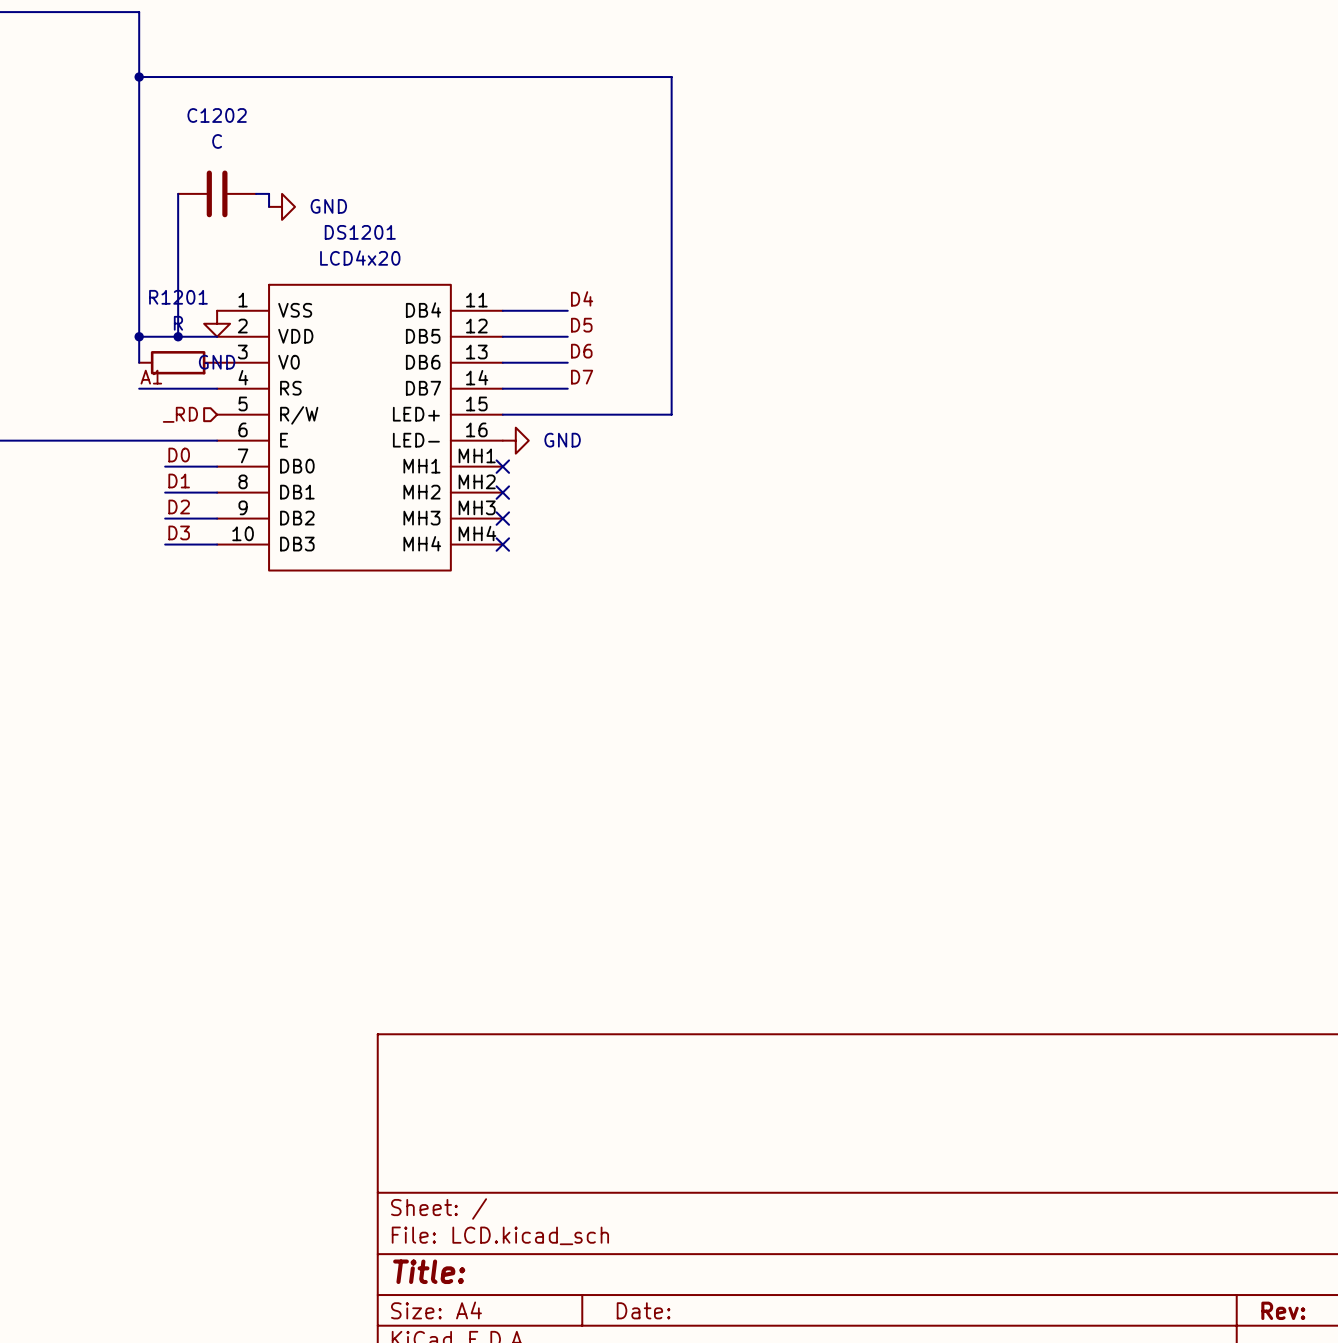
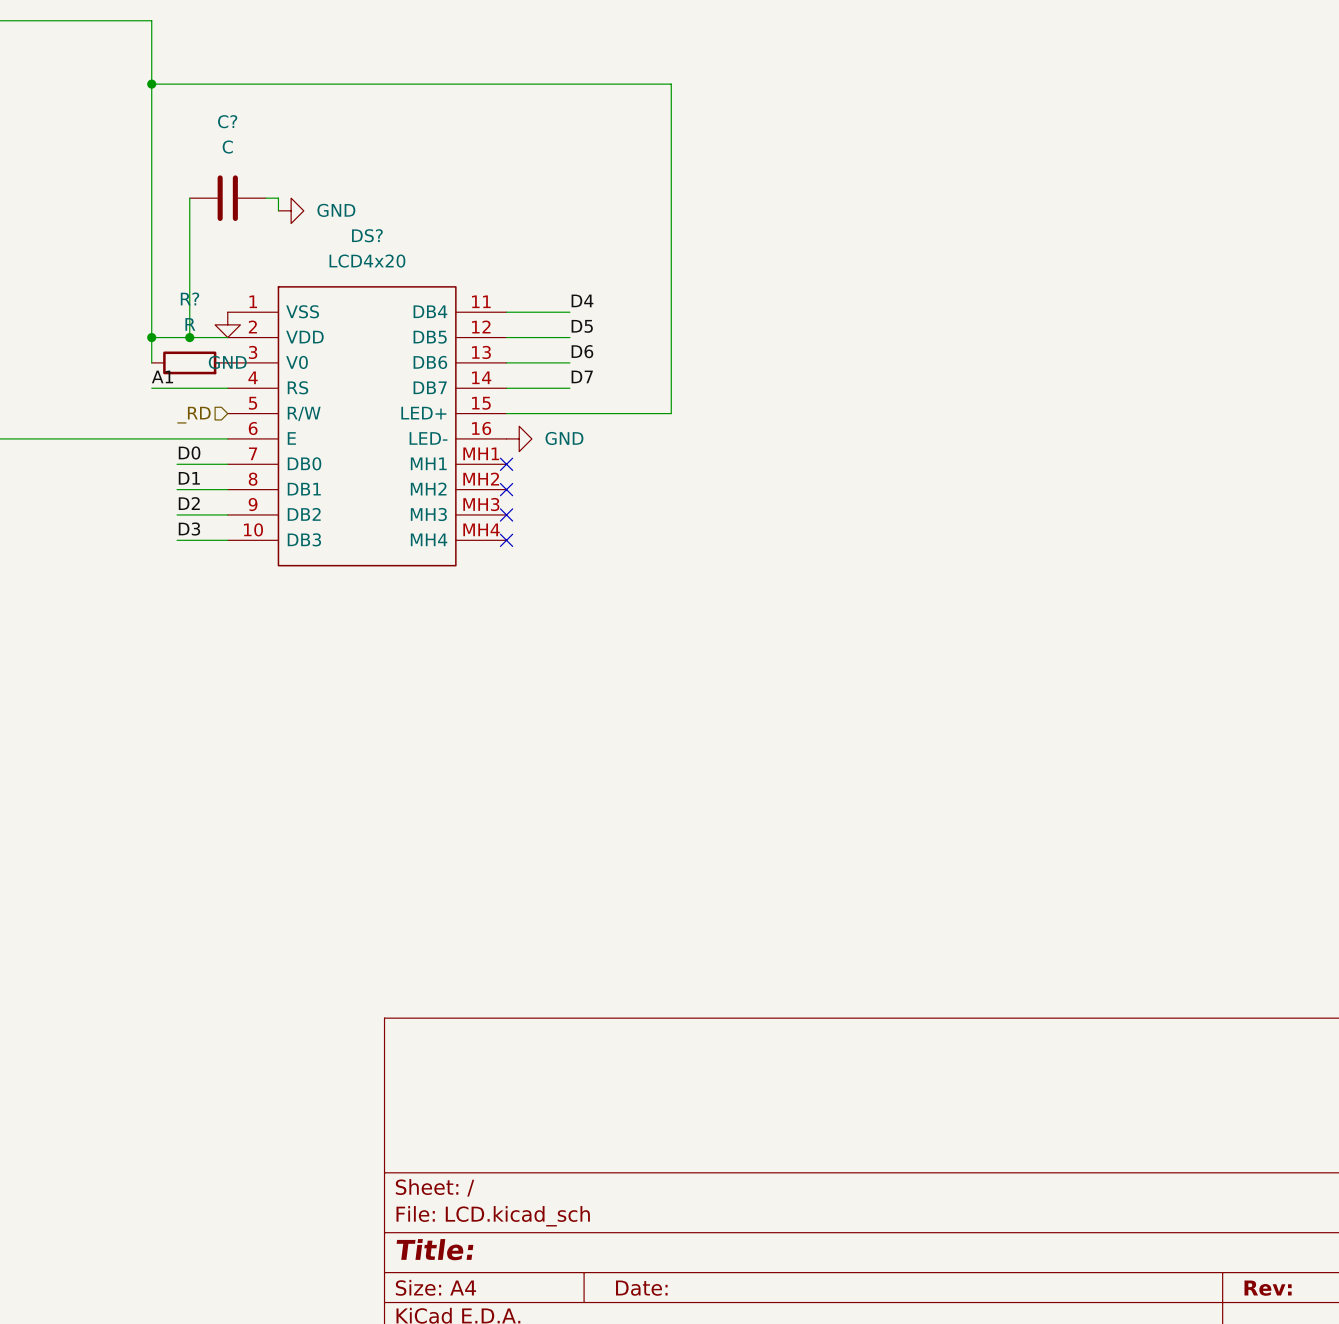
C1202 name: C1202 (217, 115) -> C? (227, 121)
DS1201 name: DS1201 (360, 232) -> DS? (367, 235)
R1201 name: R1201 (178, 297) -> R? (189, 298)

